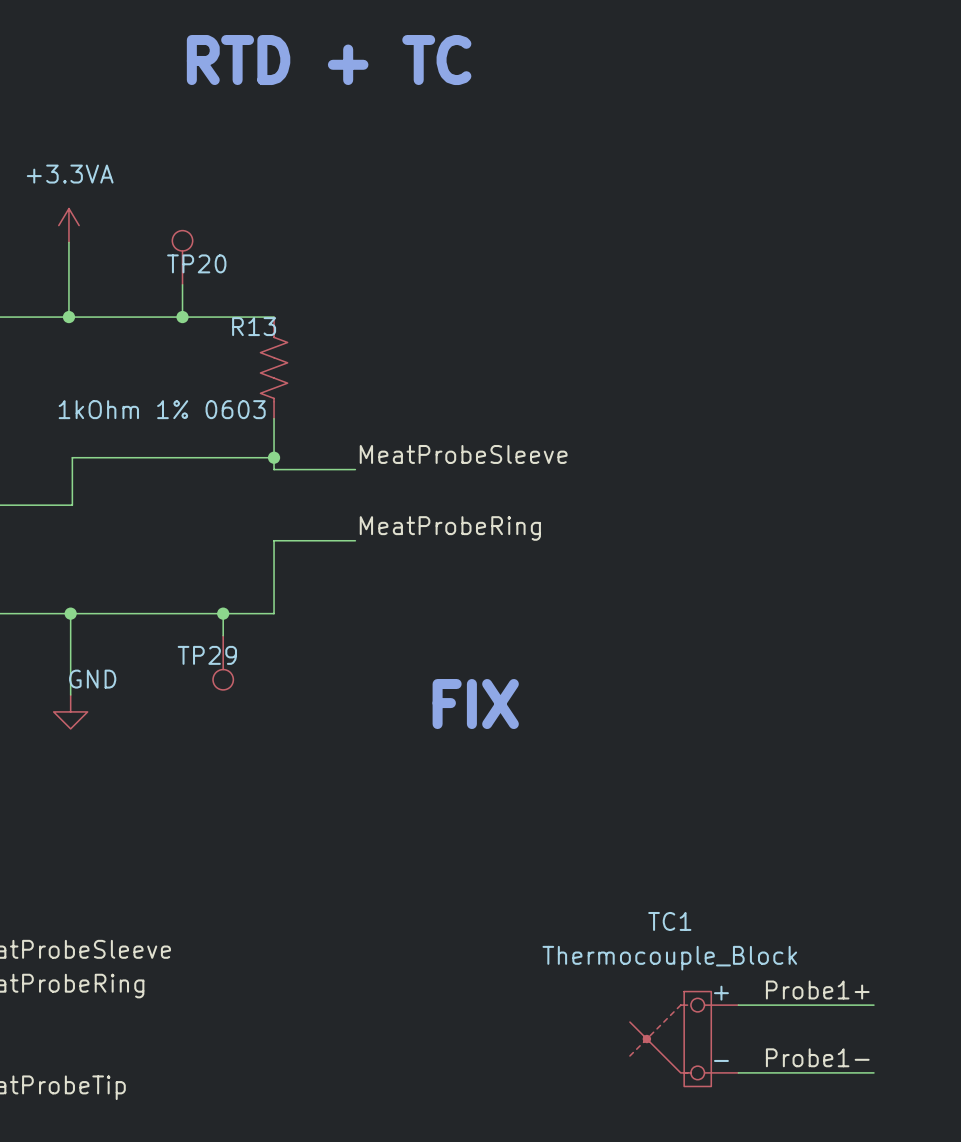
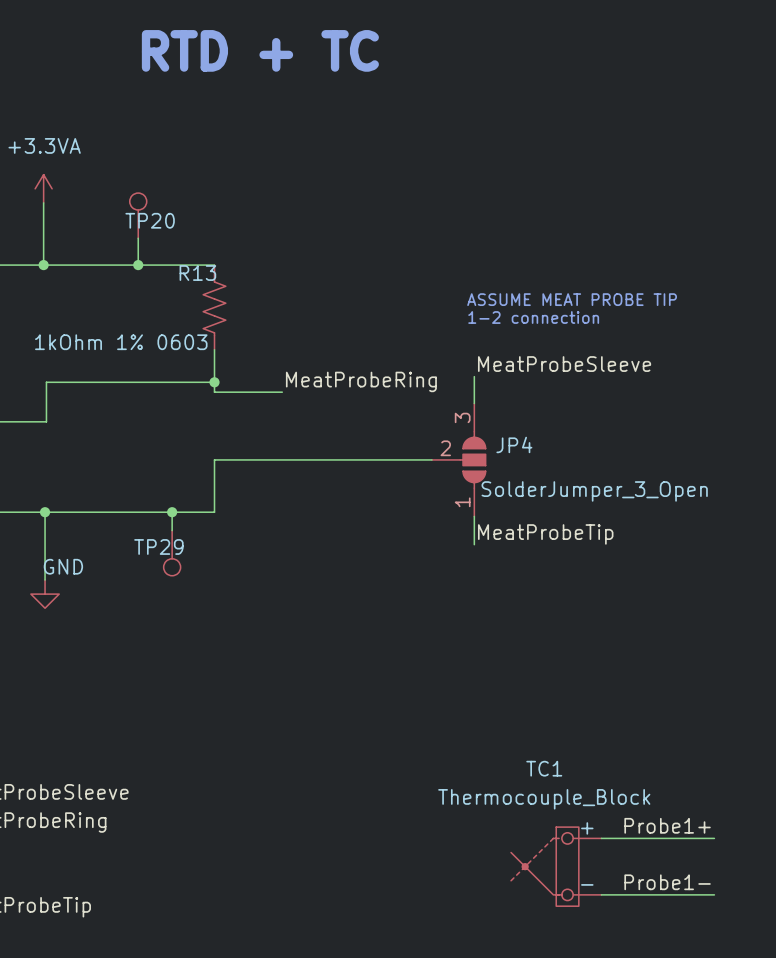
text: none -> ASSUME MEAT PROBE TIP (572, 299)
text: none -> 1-2 connection (533, 317)
label: none -> MeatProbeSleeve (564, 364)
wire: none -> (474, 376) (474, 403)
label: MeatProbeSleeve (463, 454) -> MeatProbeRing (361, 381)
label: MeatProbeRing (450, 528) -> none
wire: (355, 540) (274, 540) (274, 550) -> (431, 459) (214, 459)
JP4: none -> SolderJumper_3_Open (458, 459)
wire: none -> (474, 516) (474, 544)
label: none -> MeatProbeTip (545, 534)
text: FIX (475, 704) -> none

